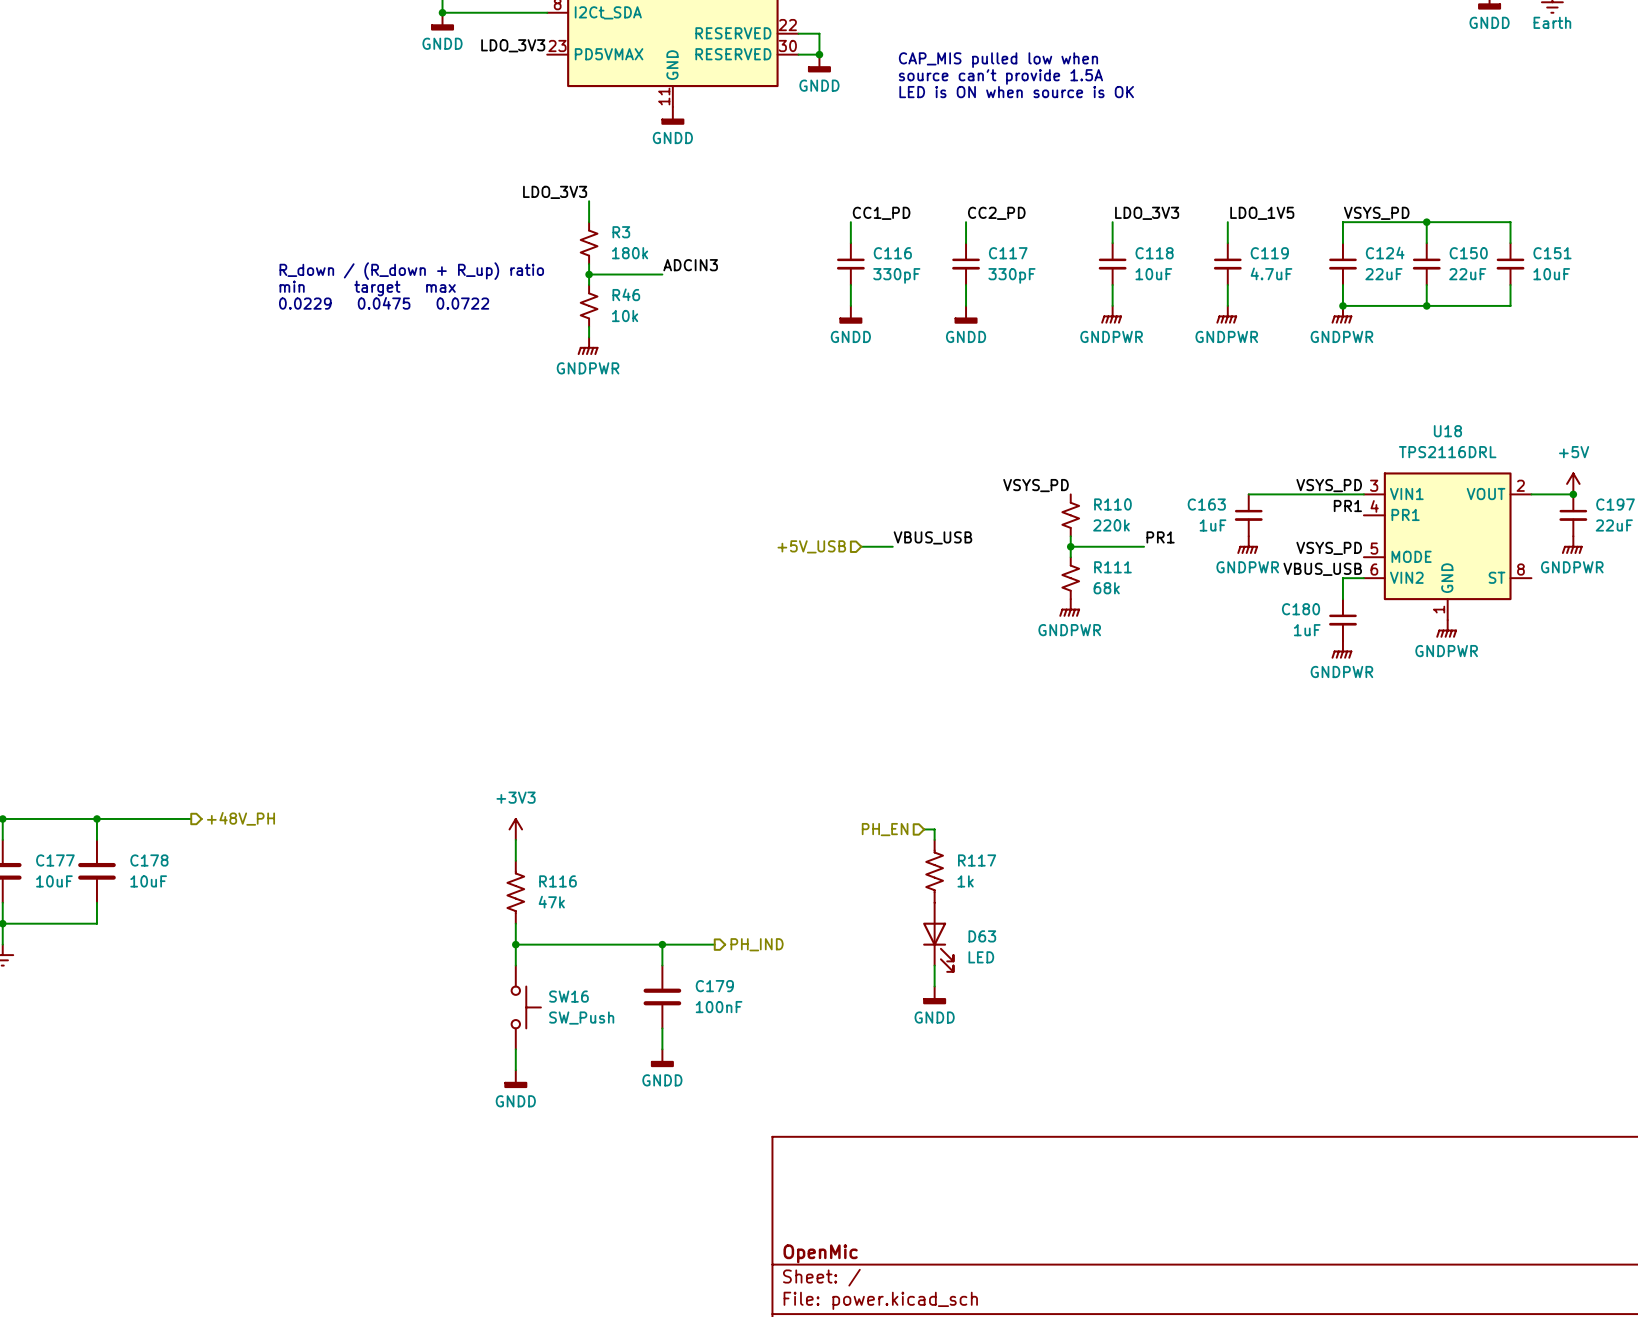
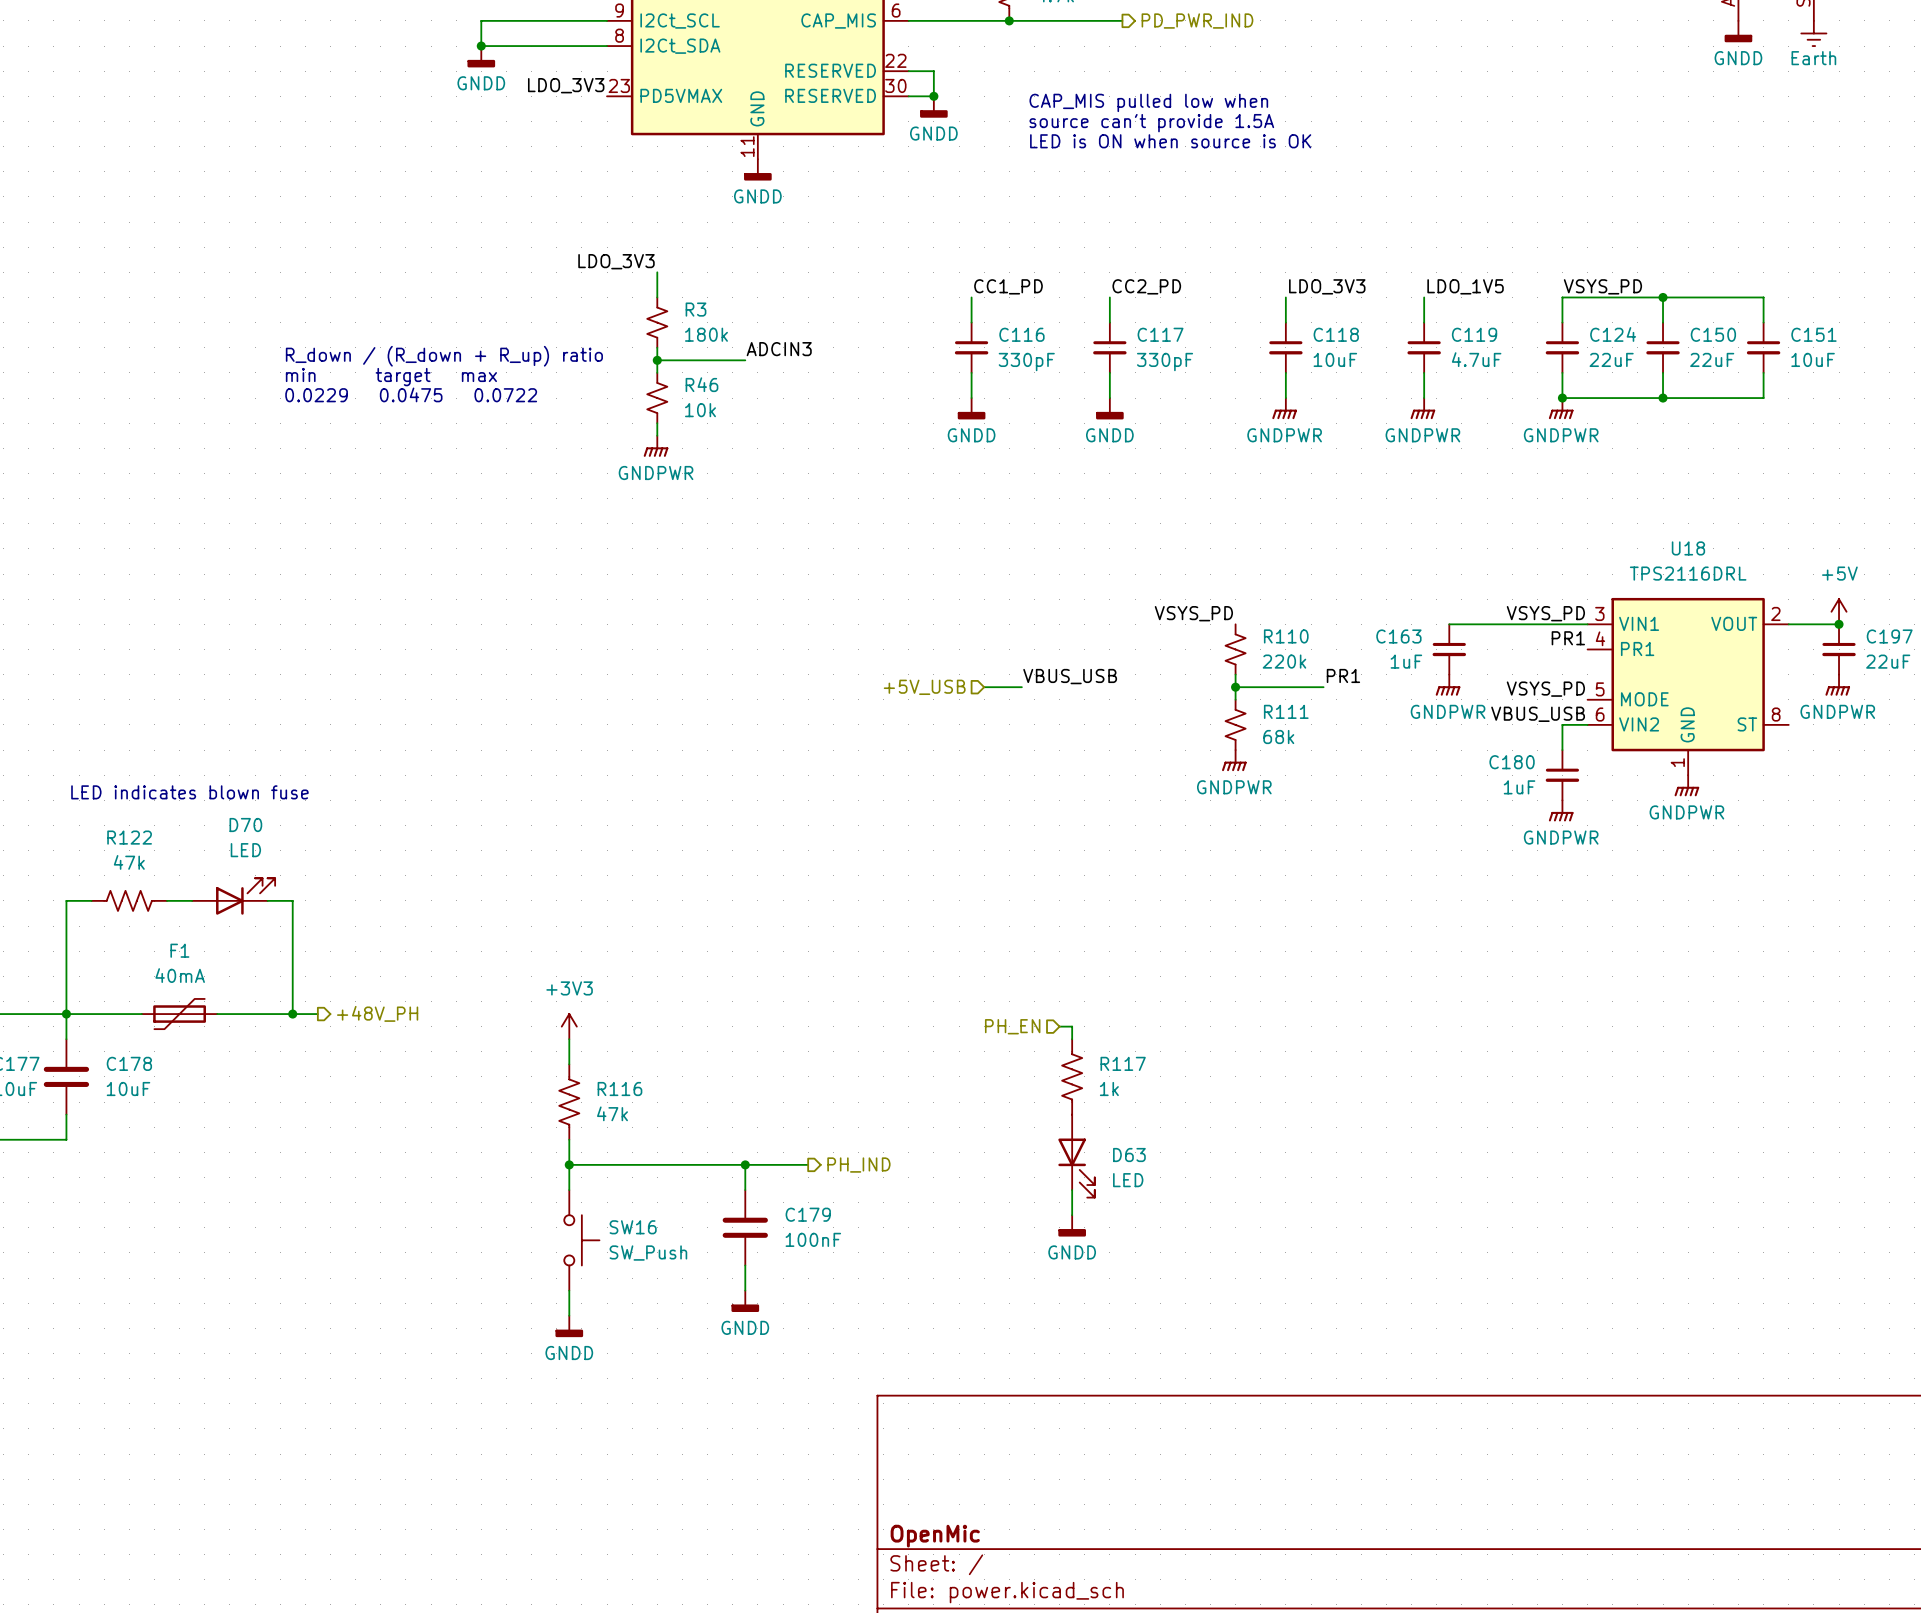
text: none -> LED indicates blown fuse (189, 792)
D70: none -> LED (233, 896)
wire: none -> (91, 900) (66, 900) (66, 1014)
R122: none -> 47k (129, 900)
wire: none -> (167, 900) (192, 900)
wire: none -> (267, 900) (292, 900) (292, 1014)
F1: none -> 40mA (179, 1014)
wire: none -> (217, 1014) (317, 1014)
hierarchical label position: +48V_PH (240, 818) -> +48V_PH (377, 1013)
junction: none -> (292, 1014)

